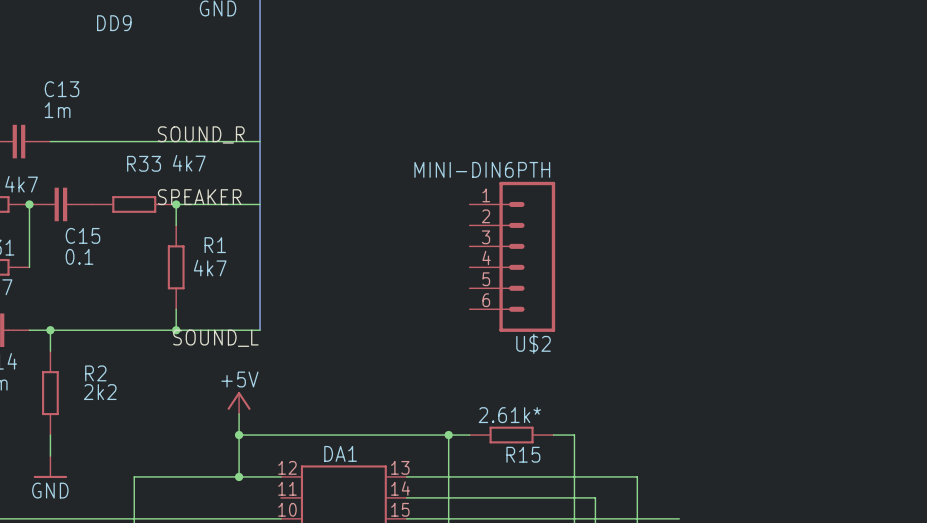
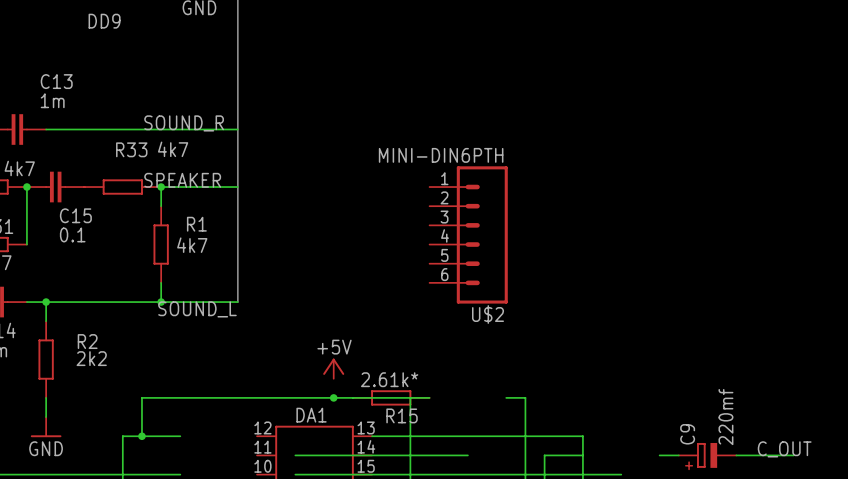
power symbol position: +5V (239, 403) -> +5V (333, 368)
wire: (239, 414) (239, 476) -> none
wire: none -> (218, 397) (141, 397) (141, 436)
junction: (239, 435) -> none
junction: none -> (333, 397)
junction: (448, 435) -> none
R15 position: (511, 435) -> (391, 397)
junction: none -> (141, 436)
wire: (197, 476) (280, 476) -> (295, 455) (372, 455)
junction: (239, 476) -> none
label: none -> C_OUT (784, 449)
wire: (511, 497) (595, 497) -> (582, 455) (544, 455)
wire: none -> (659, 455) (678, 455)
C9: none -> 220mf (707, 455)
wire: none -> (736, 455) (793, 455)
wire: (197, 518) (280, 518) -> (295, 474) (372, 474)

